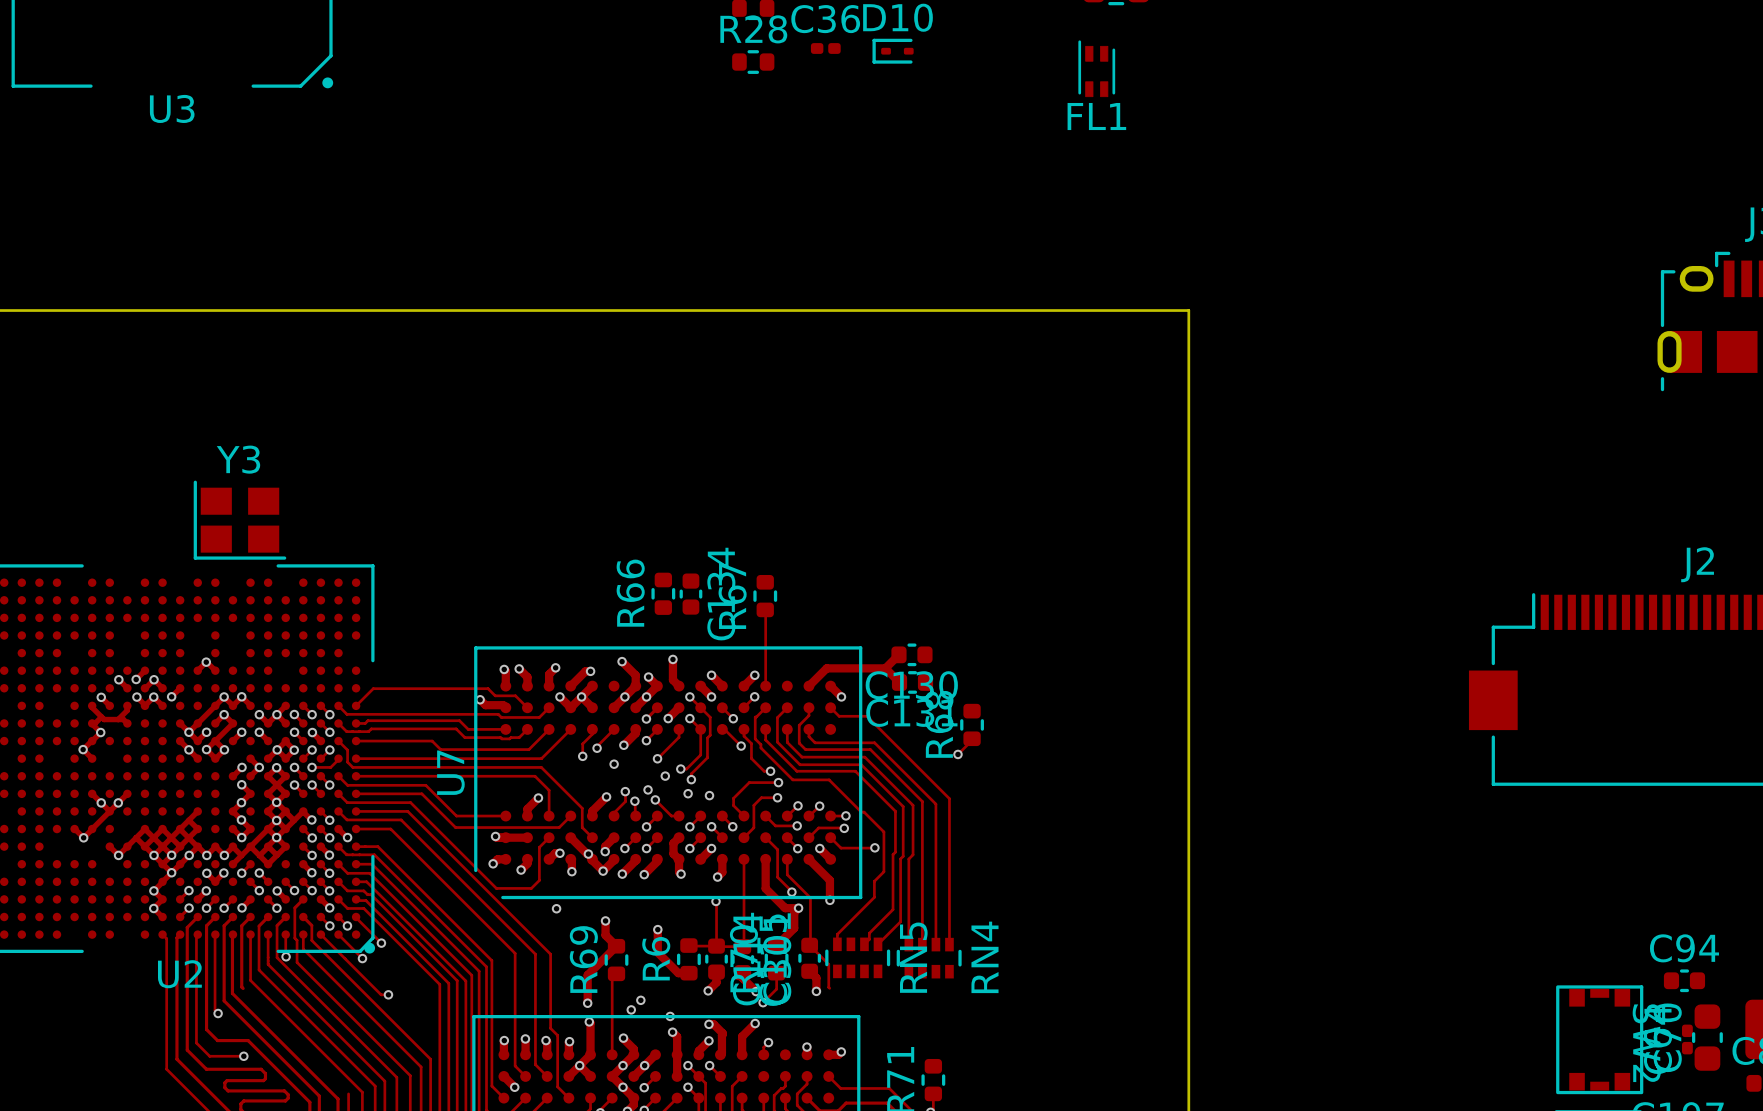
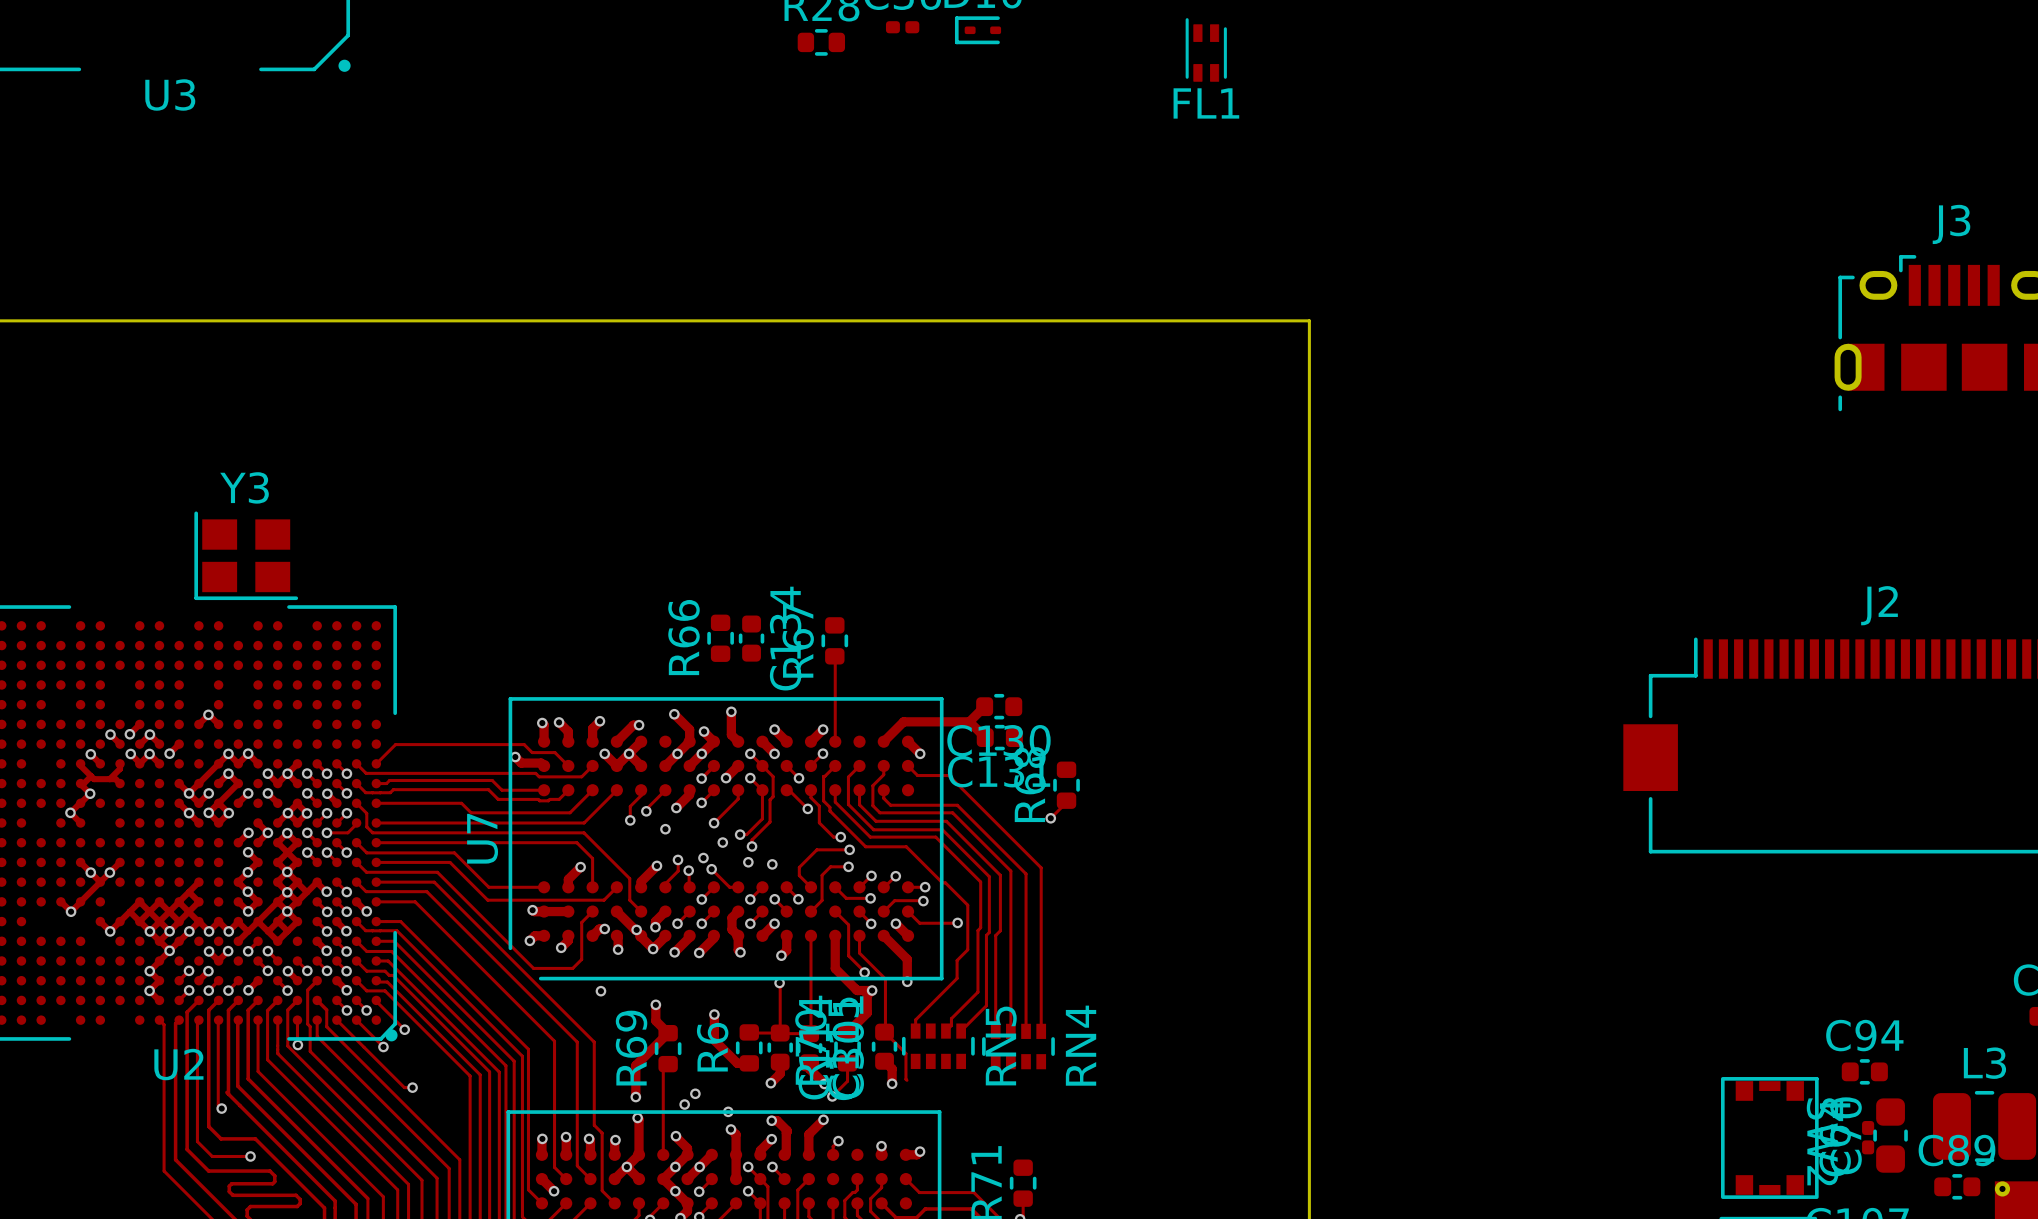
track: none -> (249, 1080) (367, 1198)

